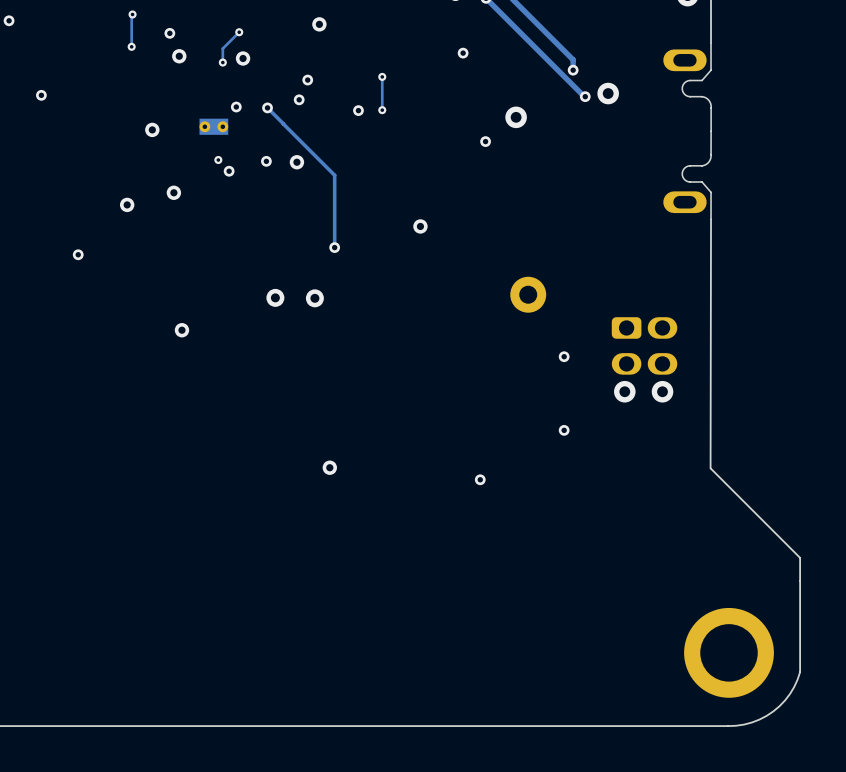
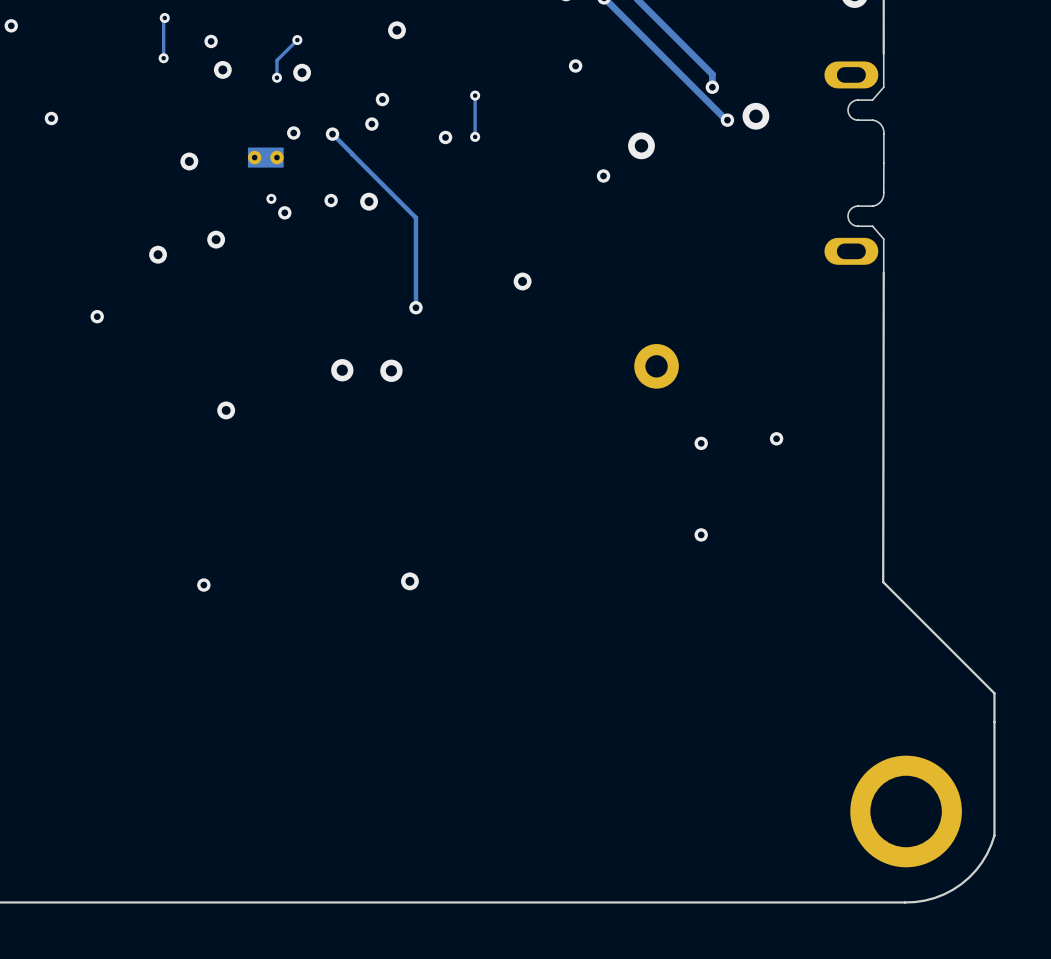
part: (644, 345) -> none
via: none -> (776, 438)
via: (624, 391) -> none
via: (662, 391) -> none
via: none -> (203, 585)
via: (480, 479) -> none

